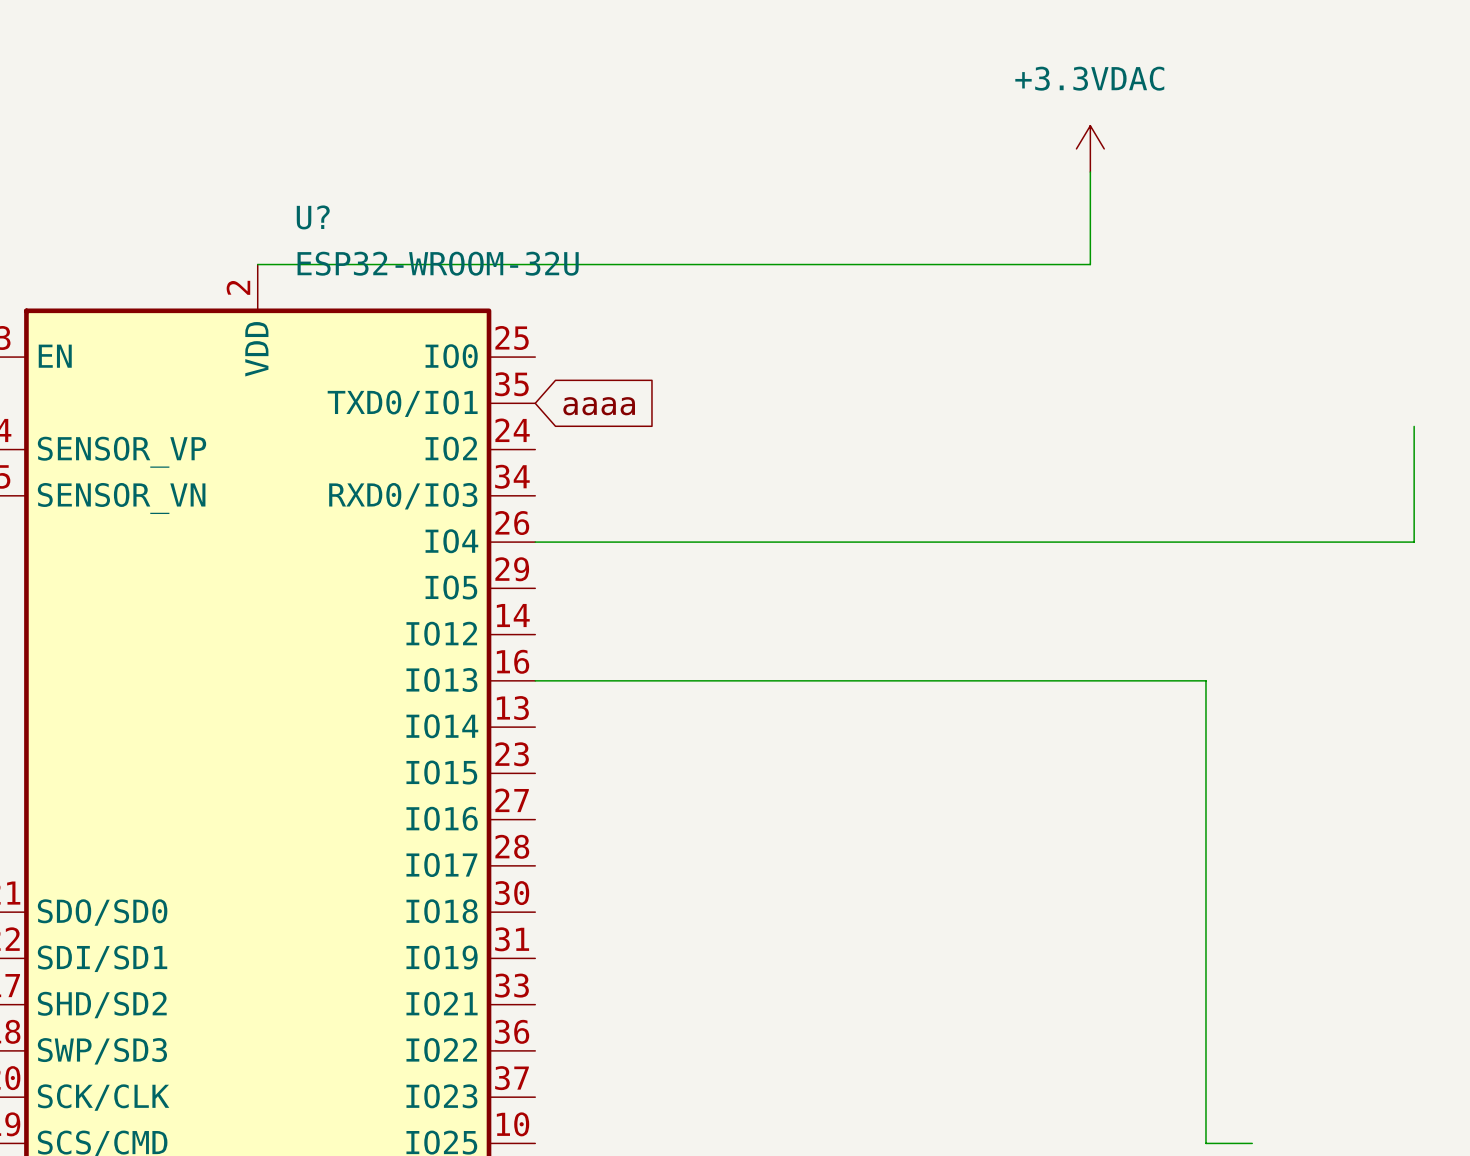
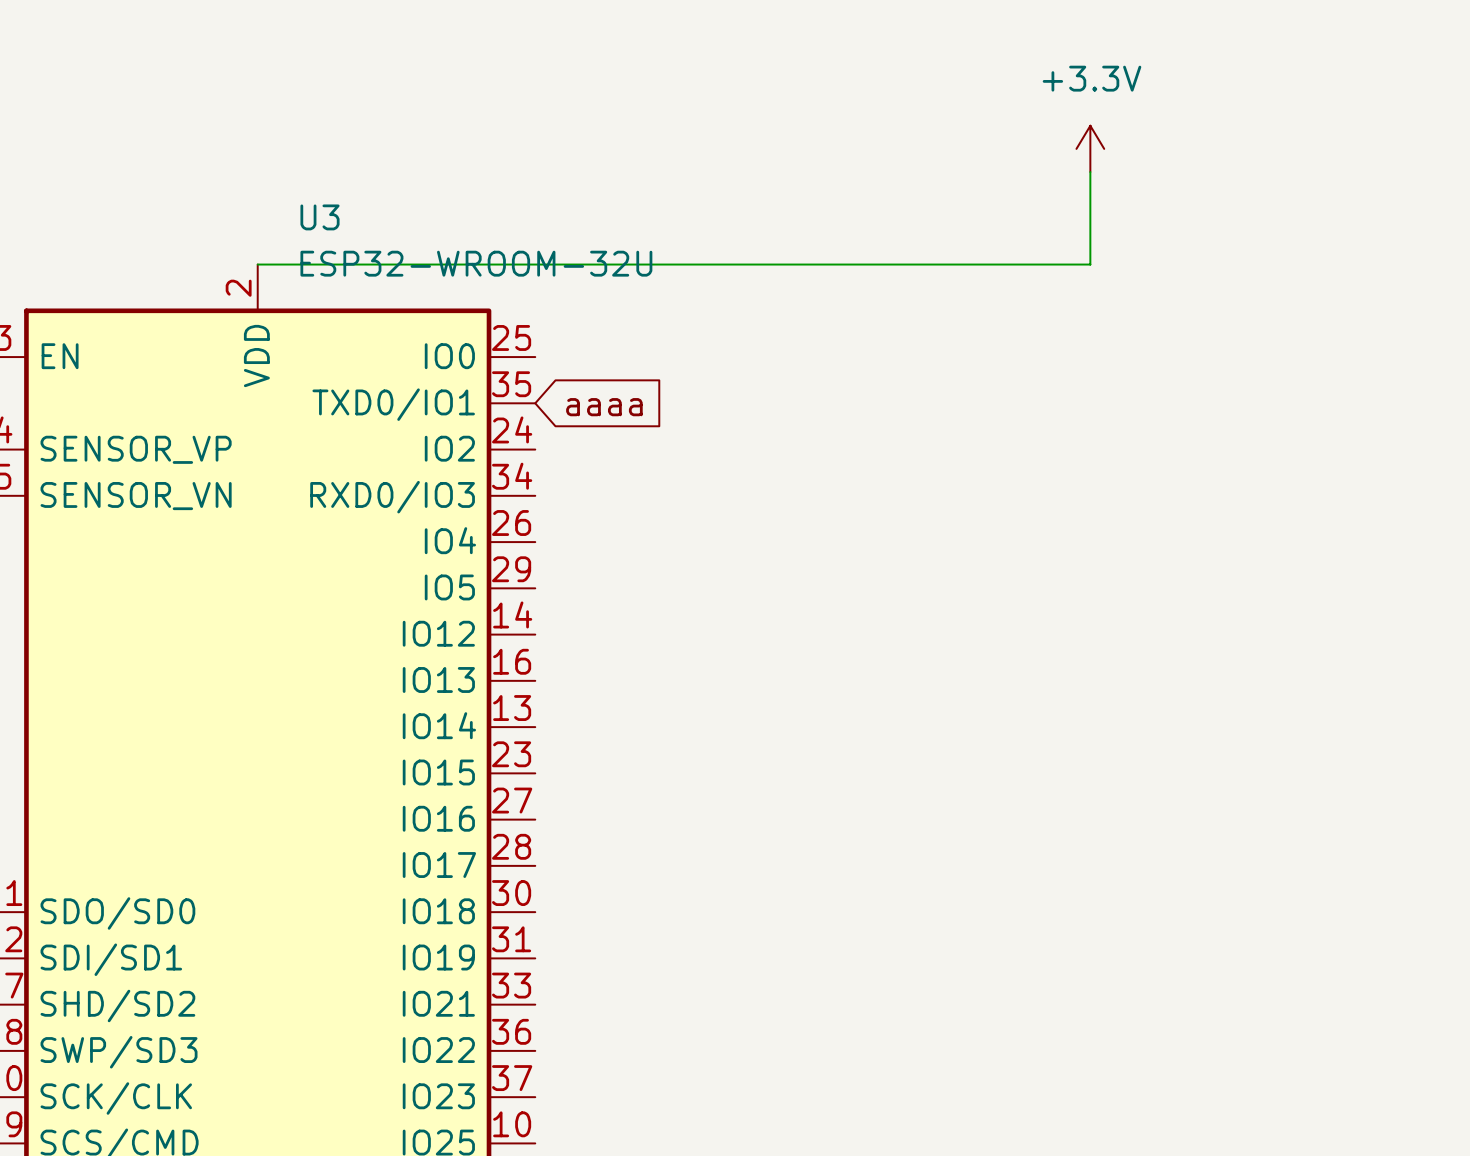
power symbol: +3.3VDAC (1090, 148) -> +3.3V (1090, 148)
U? name: U? (313, 217) -> U3 (320, 217)
wire: (1414, 426) (1414, 542) (535, 542) -> none
wire: (535, 680) (1205, 680) (1205, 1143) (1252, 1143) -> none

